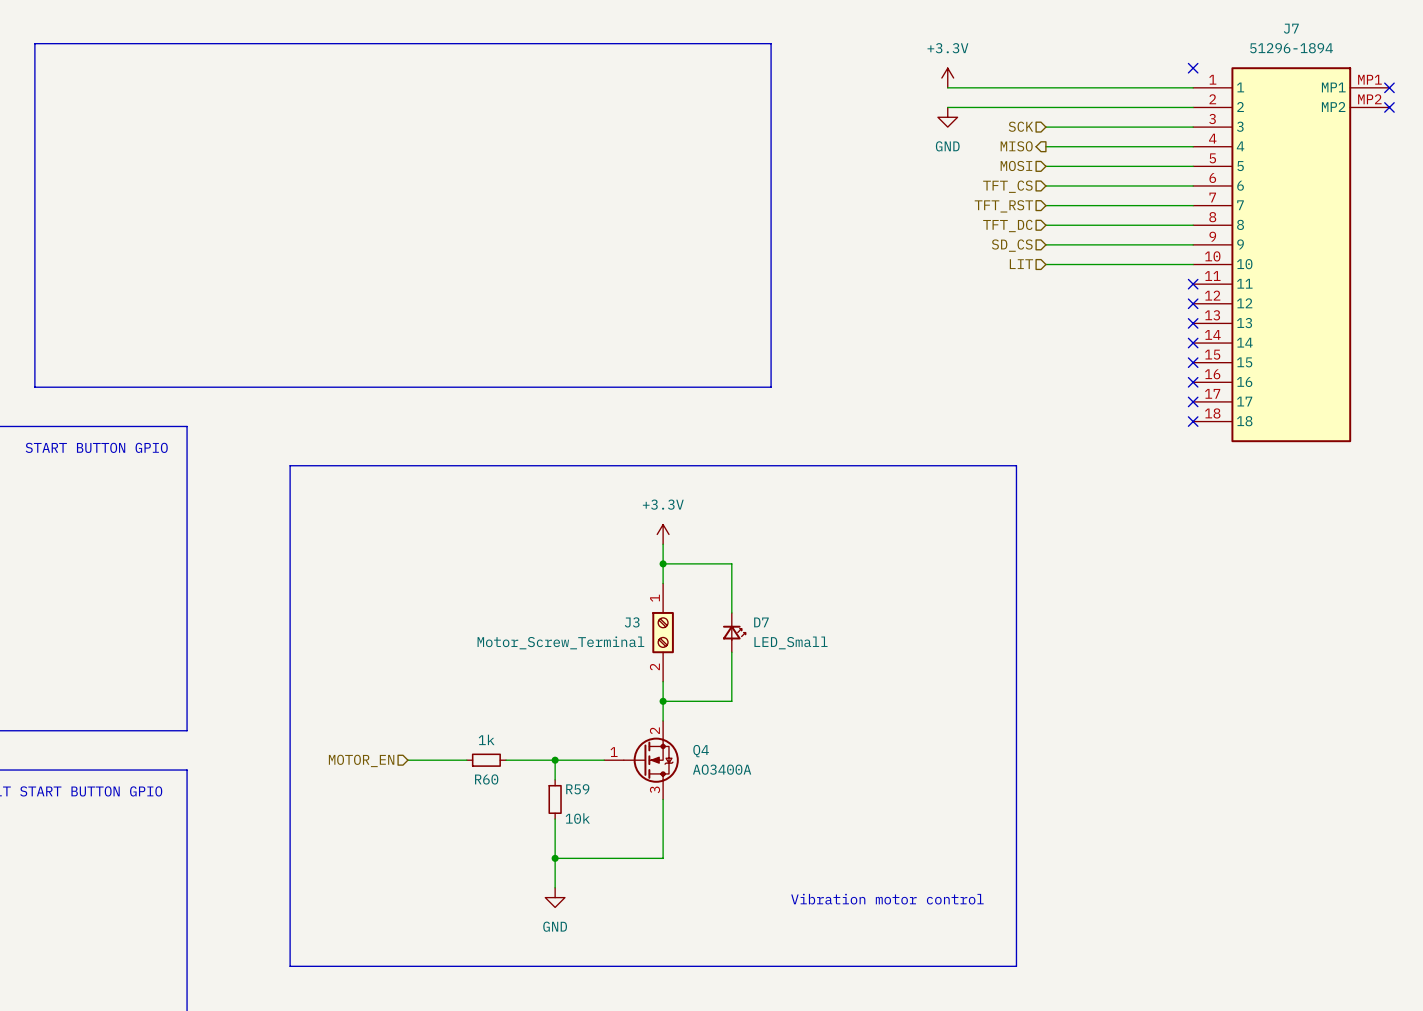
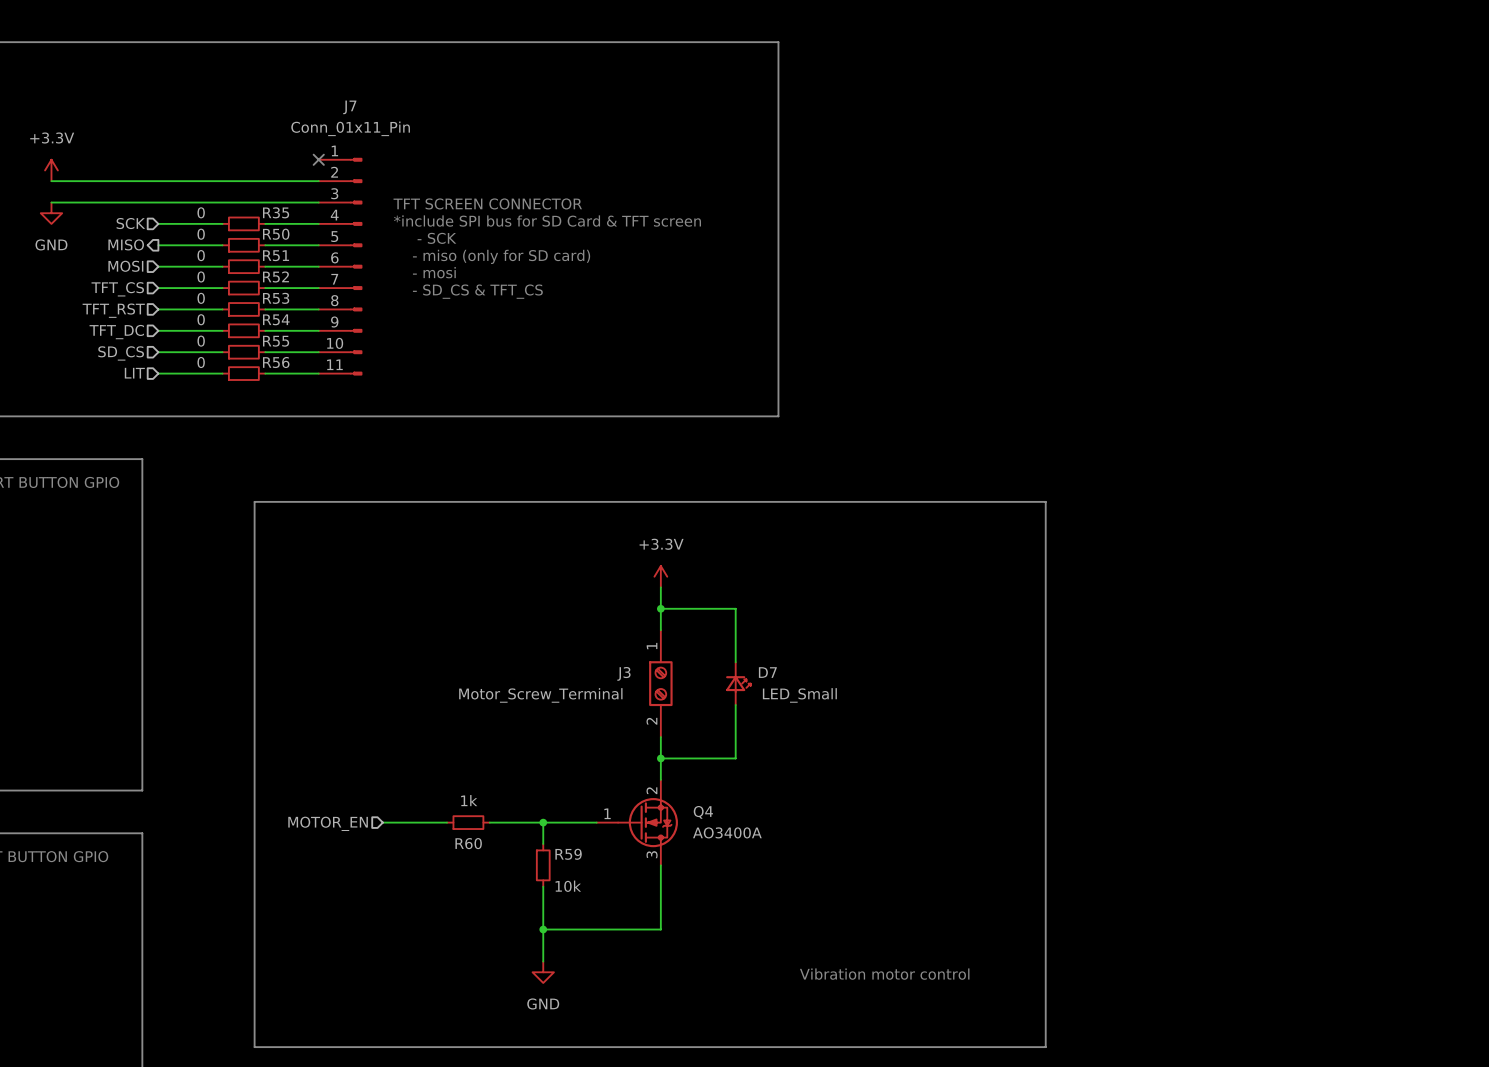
J7 name position: J7 (1291, 28) -> J7 (349, 107)
J7 value: 51296-1894 (1291, 48) -> Conn_01x11_Pin (350, 128)
J7 symbol: [1193, 67, 1390, 443] -> [318, 158, 363, 376]
no-connect mark: (1193, 68) -> none
power symbol: +3.3V (947, 78) -> none
wire: (947, 87) (1193, 87) -> none
no-connect mark: (1389, 87) -> none
wire: (947, 107) (1193, 107) -> none
no-connect mark: (1389, 107) -> none
power symbol: GND (947, 117) -> none
hierarchical label: SCK (1020, 126) -> none
wire: (1045, 127) (1193, 127) -> none
hierarchical label: MISO (1016, 146) -> none
wire: (1045, 146) (1193, 146) -> none
no-connect mark: none -> (318, 159)
power symbol: none -> +3.3V (51, 170)
hierarchical label: MOSI (1016, 165) -> none
wire: (1045, 166) (1193, 166) -> none
wire: none -> (51, 181) (318, 181)
wire: (1045, 185) (1193, 185) -> none
hierarchical label: TFT_CS (1007, 186) -> none
wire: none -> (51, 202) (318, 202)
text: none -> TFT SCREEN CONNECTOR (487, 203)
power symbol: none -> GND (51, 213)
wire: (1045, 205) (1193, 205) -> none
hierarchical label: TFT_RST (1003, 206) -> none
text: none -> *include SPI bus for SD Card & TFT screen (547, 221)
hierarchical label: none -> SCK (130, 223)
wire: none -> (158, 223) (222, 223)
R35: none -> 0 (243, 223)
wire: none -> (265, 223) (318, 223)
text: none -> - SCK (436, 238)
hierarchical label: TFT_DC (1007, 225) -> none
wire: (1045, 225) (1193, 225) -> none
hierarchical label: none -> MISO (126, 244)
wire: none -> (158, 245) (222, 245)
R50: none -> 0 (243, 245)
wire: none -> (265, 245) (318, 245)
text: none -> - miso (only for SD card) (501, 256)
wire: (1045, 244) (1193, 244) -> none
hierarchical label: SD_CS (1012, 245) -> none
hierarchical label: none -> MOSI (125, 266)
wire: none -> (158, 266) (222, 266)
R51: none -> 0 (243, 266)
wire: none -> (265, 266) (318, 266)
text: none -> - mosi (434, 272)
hierarchical label: LIT (1021, 264) -> none
wire: (1045, 264) (1193, 264) -> none
wire: none -> (158, 288) (222, 288)
R52: none -> 0 (243, 288)
wire: none -> (265, 288) (318, 288)
hierarchical label: none -> TFT_CS (117, 289)
text: none -> - SD_CS & TFT_CS (477, 291)
no-connect mark: (1193, 284) -> none
hierarchical label: none -> TFT_RST (113, 310)
wire: none -> (158, 309) (222, 309)
R53: none -> 0 (243, 309)
wire: none -> (265, 309) (318, 309)
no-connect mark: (1193, 303) -> none
wire: none -> (158, 330) (222, 330)
R54: none -> 0 (243, 330)
wire: none -> (265, 330) (318, 330)
hierarchical label: none -> TFT_DC (116, 332)
no-connect mark: (1193, 323) -> none
wire: none -> (158, 352) (222, 352)
R55: none -> 0 (243, 352)
wire: none -> (265, 352) (318, 352)
hierarchical label: none -> SD_CS (121, 353)
no-connect mark: (1193, 343) -> none
hierarchical label: none -> LIT (134, 373)
wire: none -> (158, 373) (222, 373)
R56: none -> 0 (243, 373)
wire: none -> (265, 373) (318, 373)
no-connect mark: (1193, 362) -> none
no-connect mark: (1193, 382) -> none
no-connect mark: (1193, 401) -> none
no-connect mark: (1193, 421) -> none

